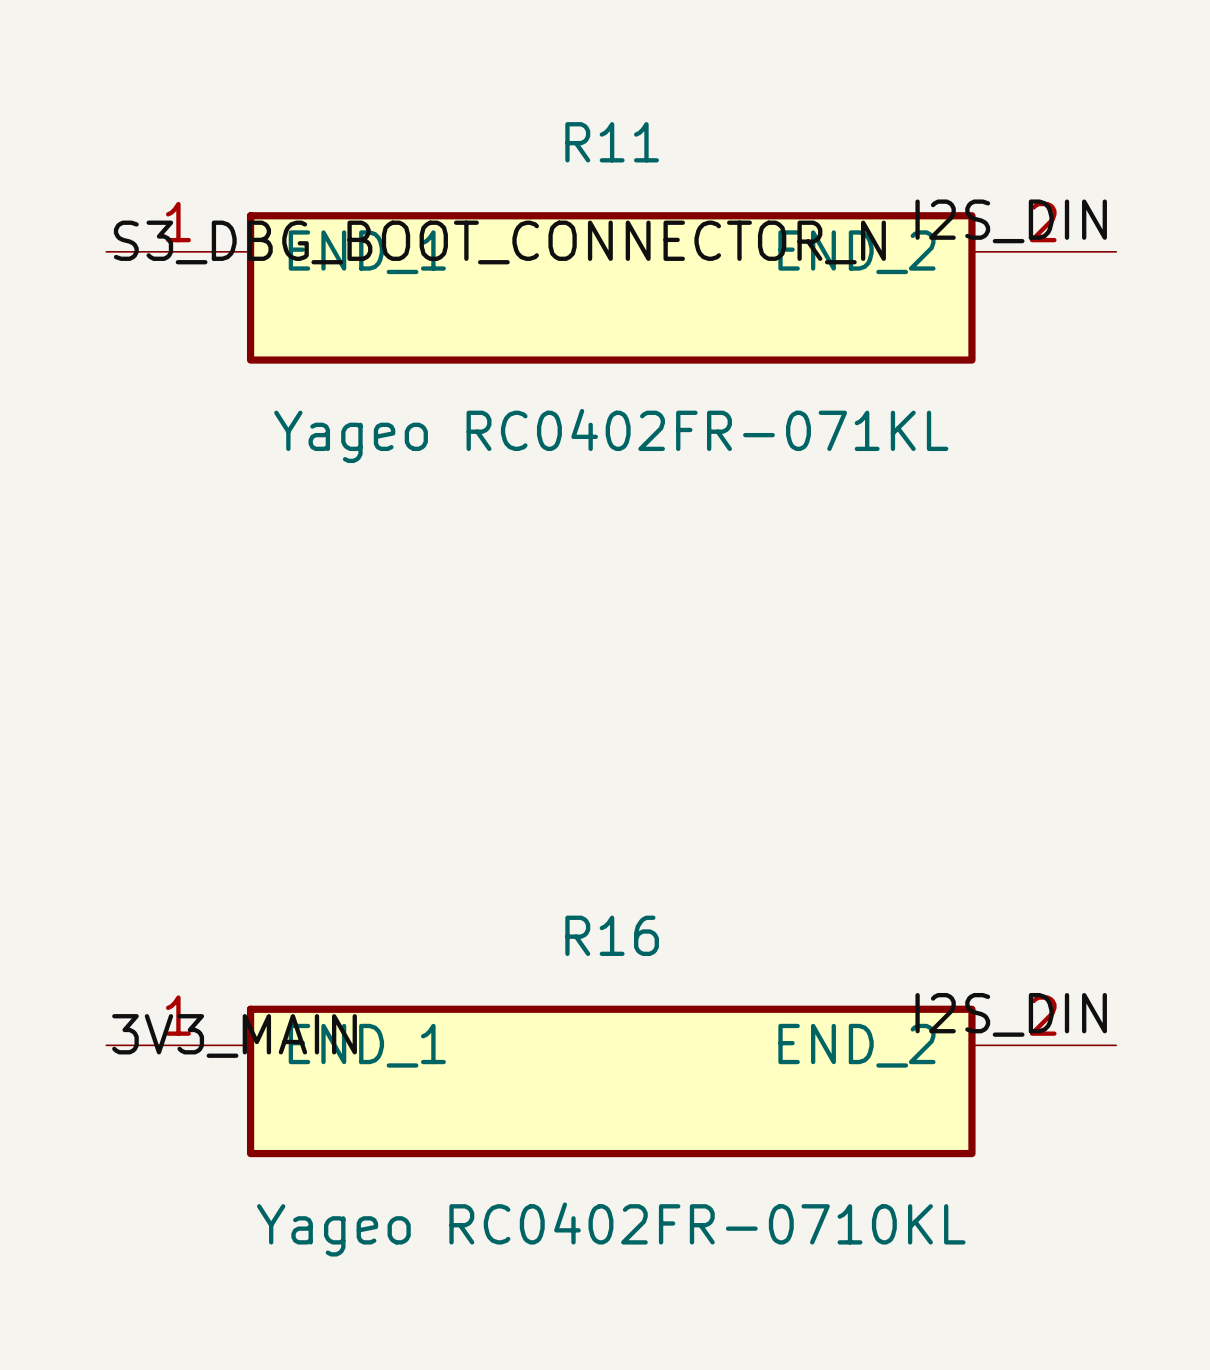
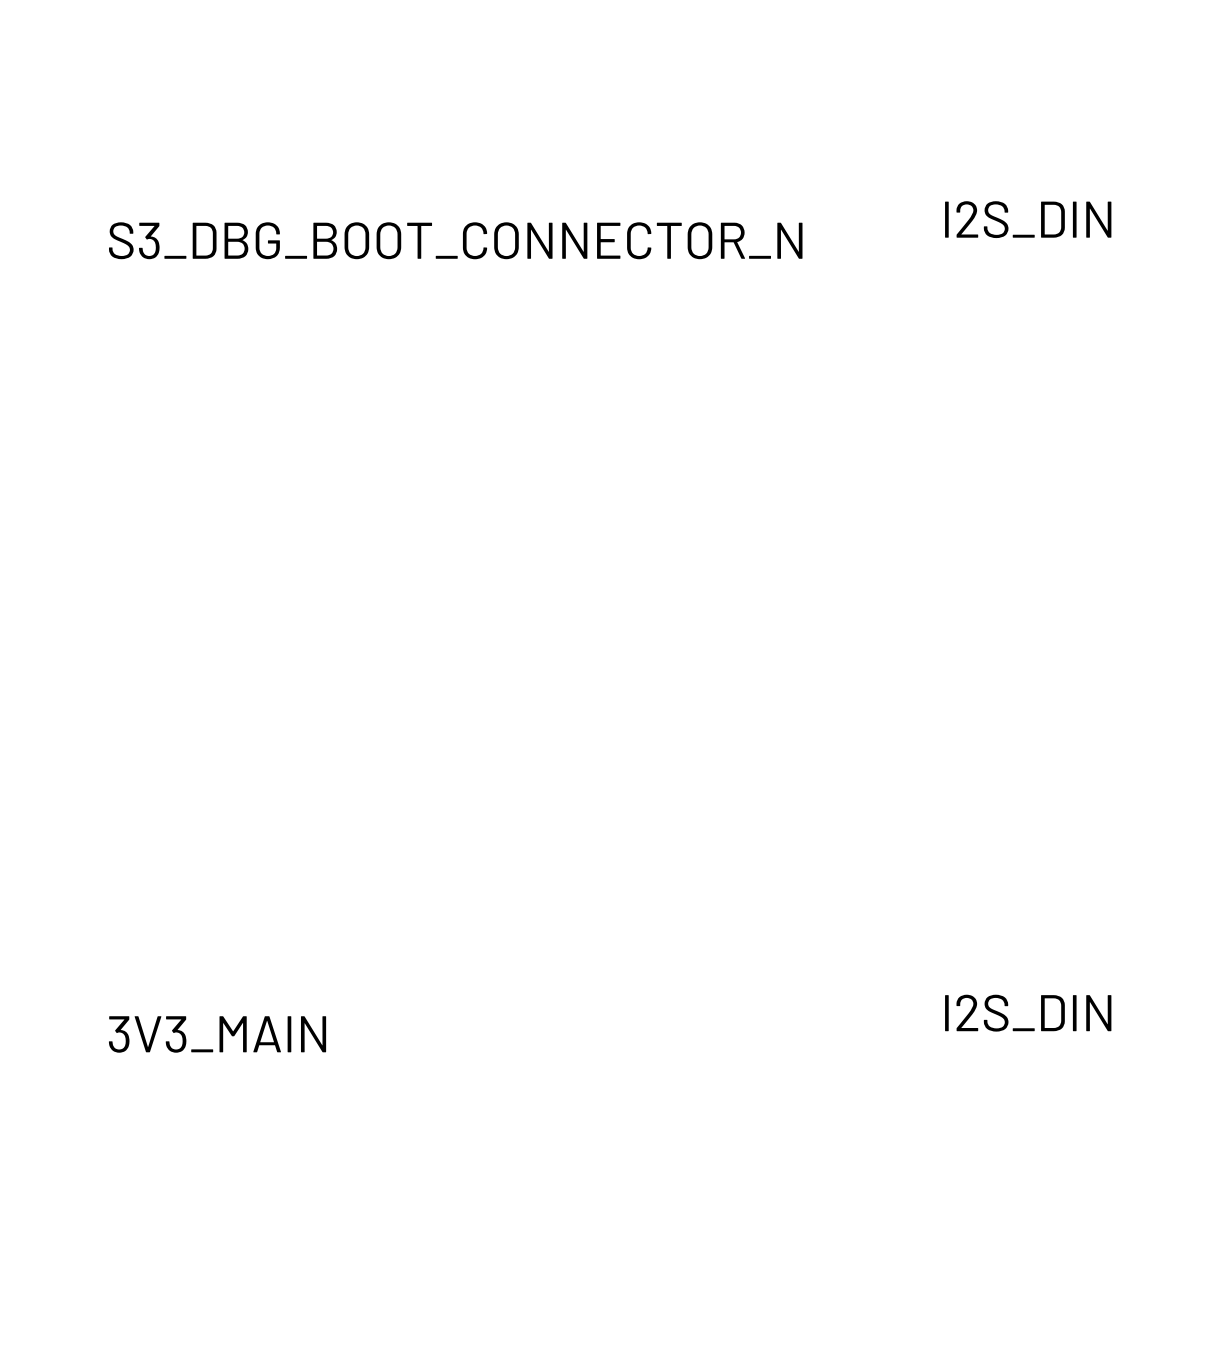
R11: Yageo RC0402FR-071KL (611, 287) -> none
R16: Yageo RC0402FR-0710KL (611, 1081) -> none

